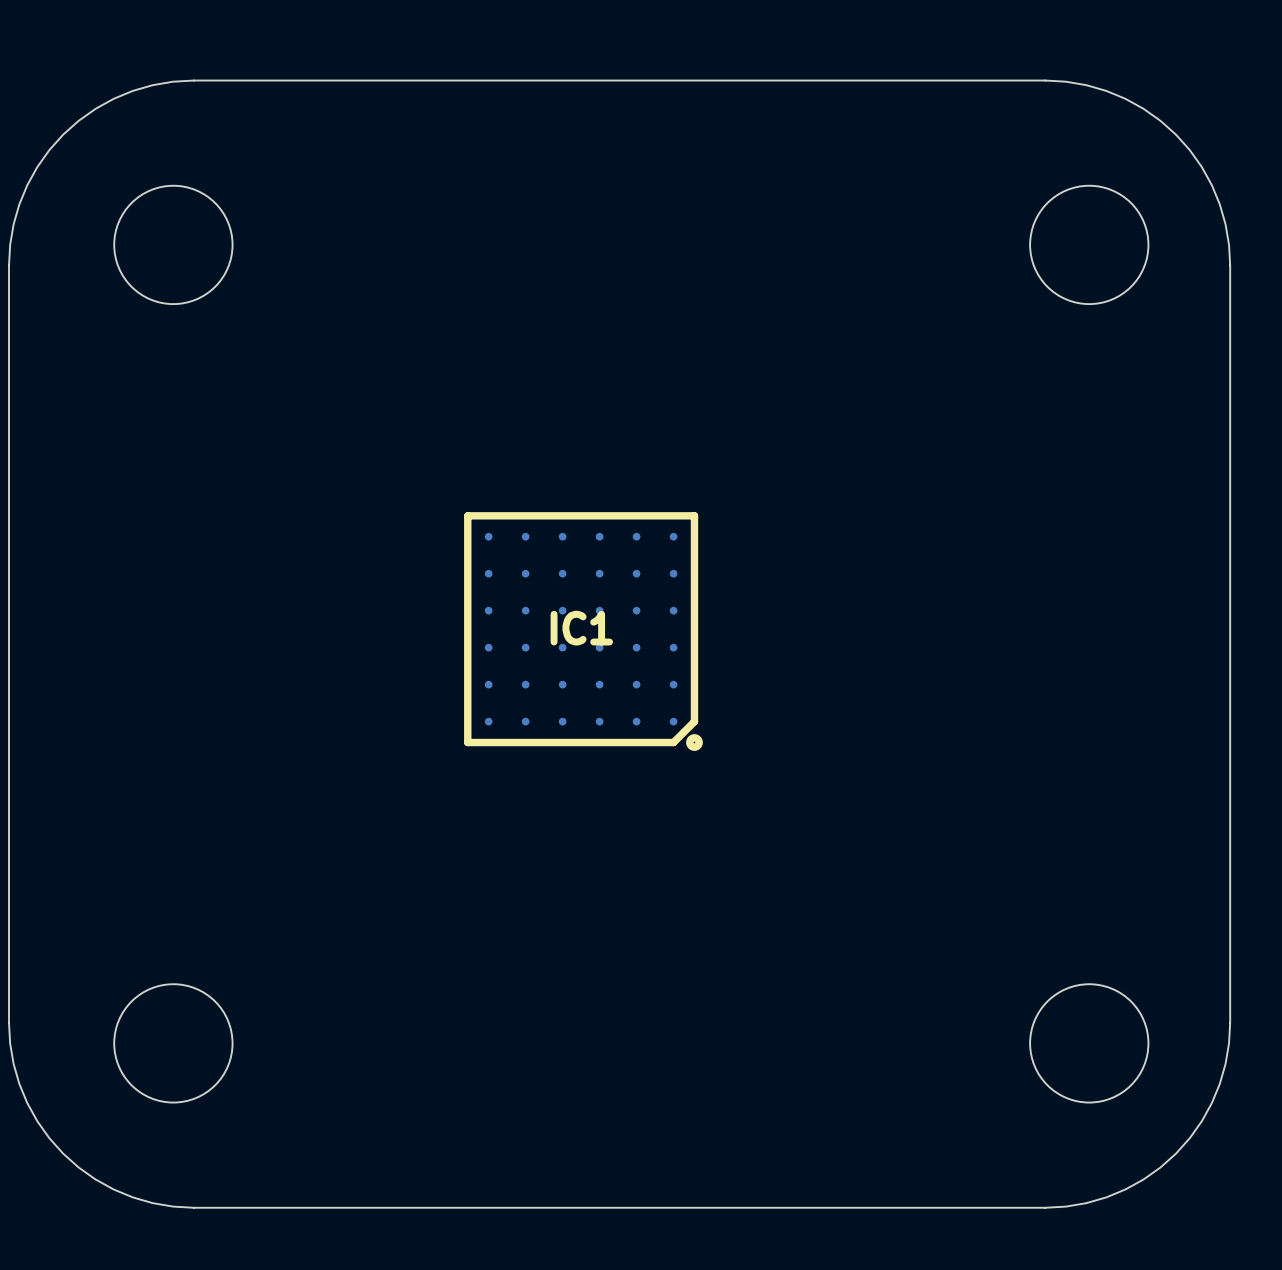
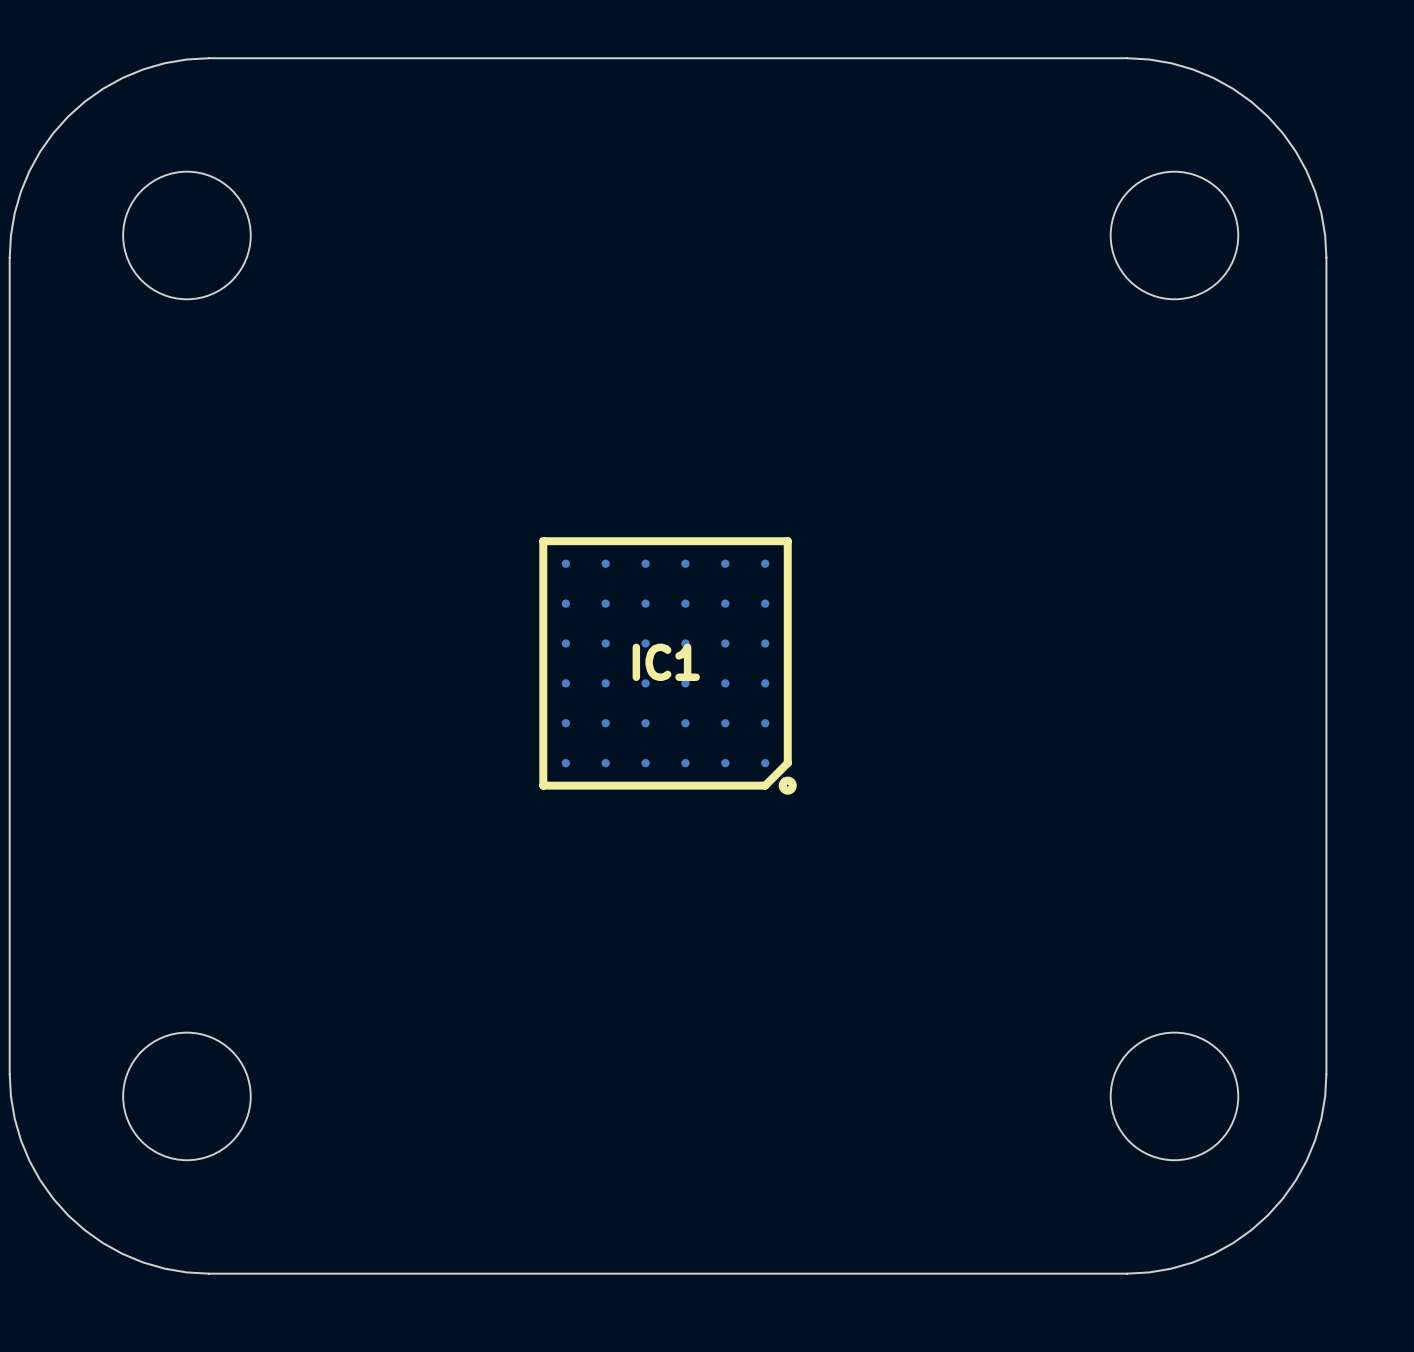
IC1 position: (583, 631) -> (668, 665)

